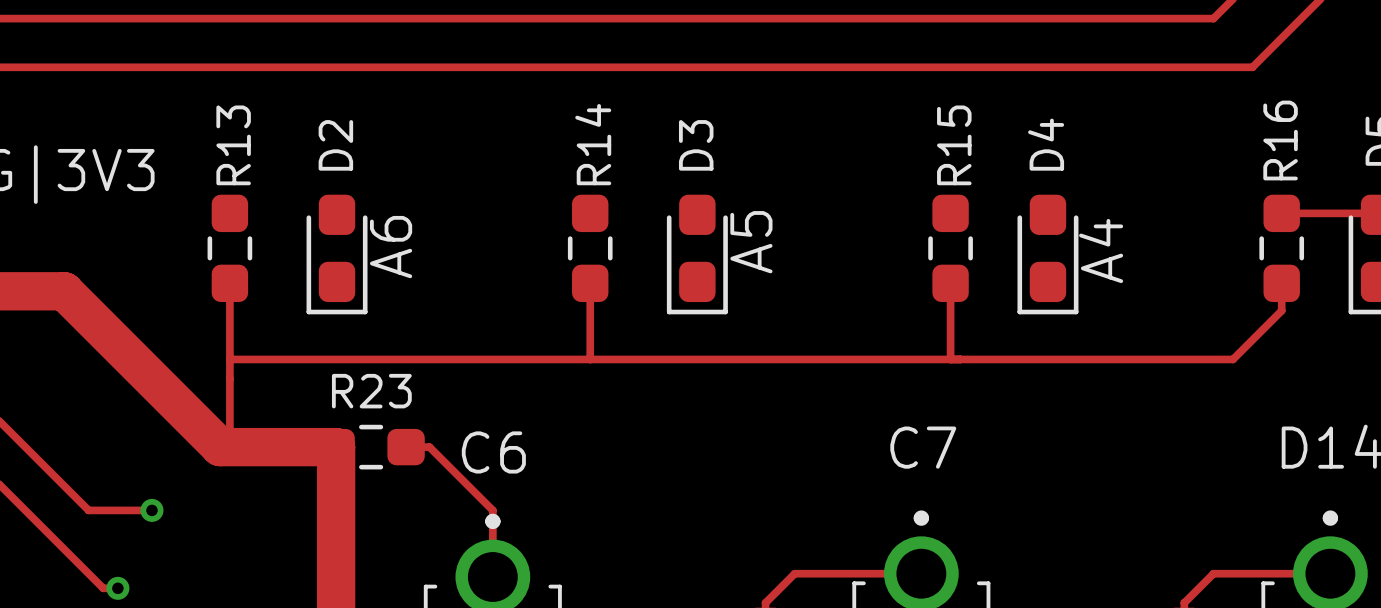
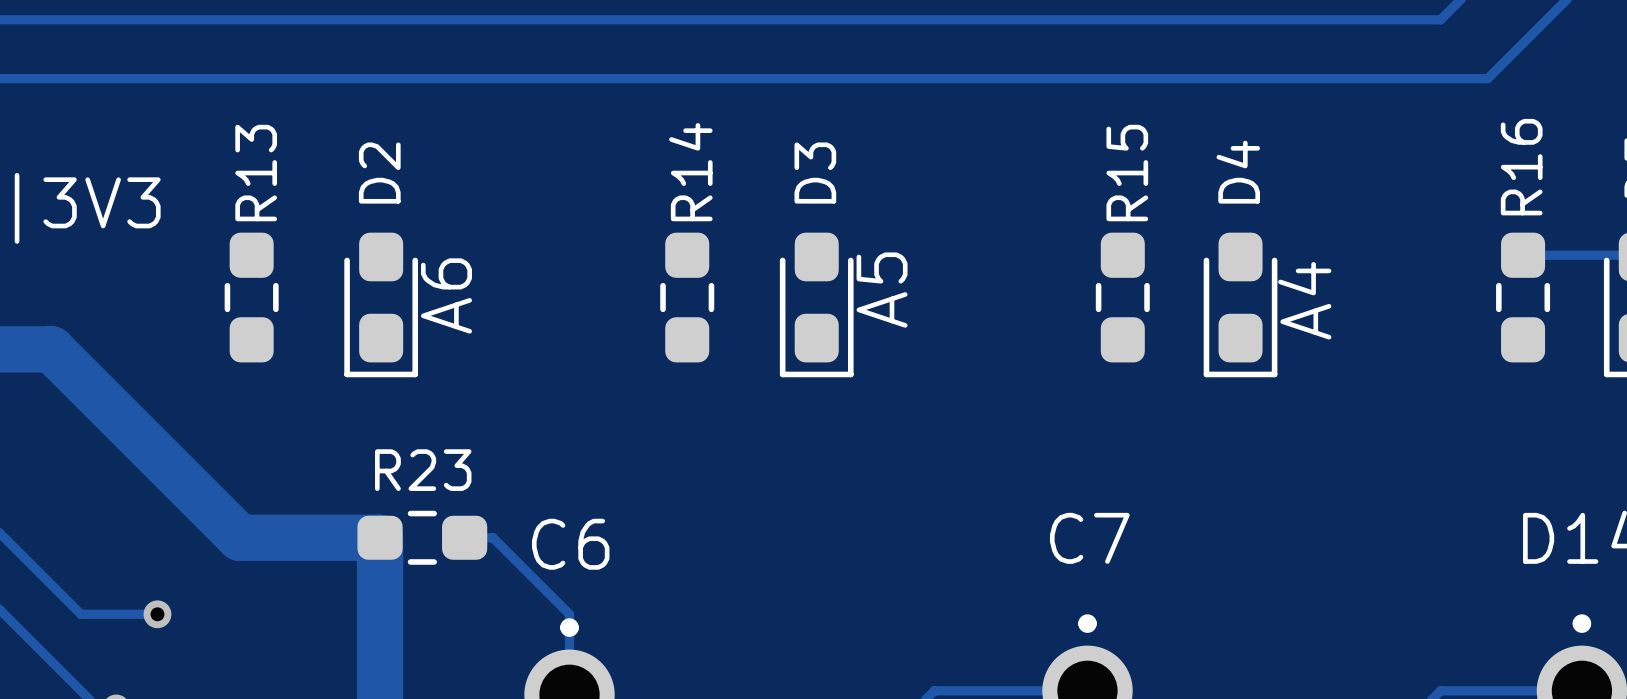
track: (229, 283) (229, 437) (220, 447) -> none
track: (590, 283) (590, 359) -> none
track: (950, 283) (950, 359) -> none
track: (1281, 283) (1281, 310) (1233, 359) (229, 359) -> none

